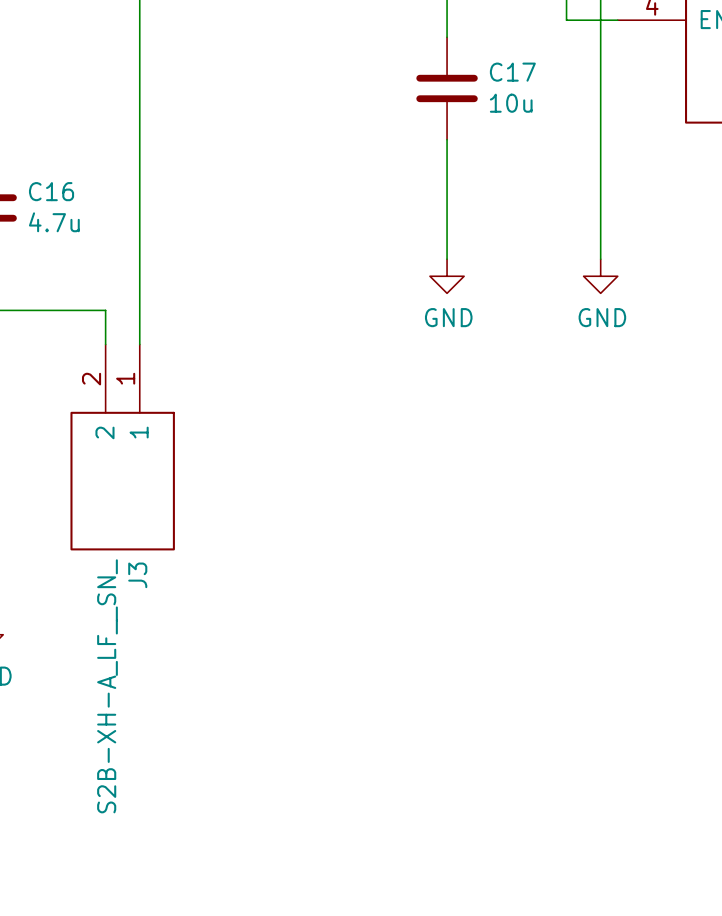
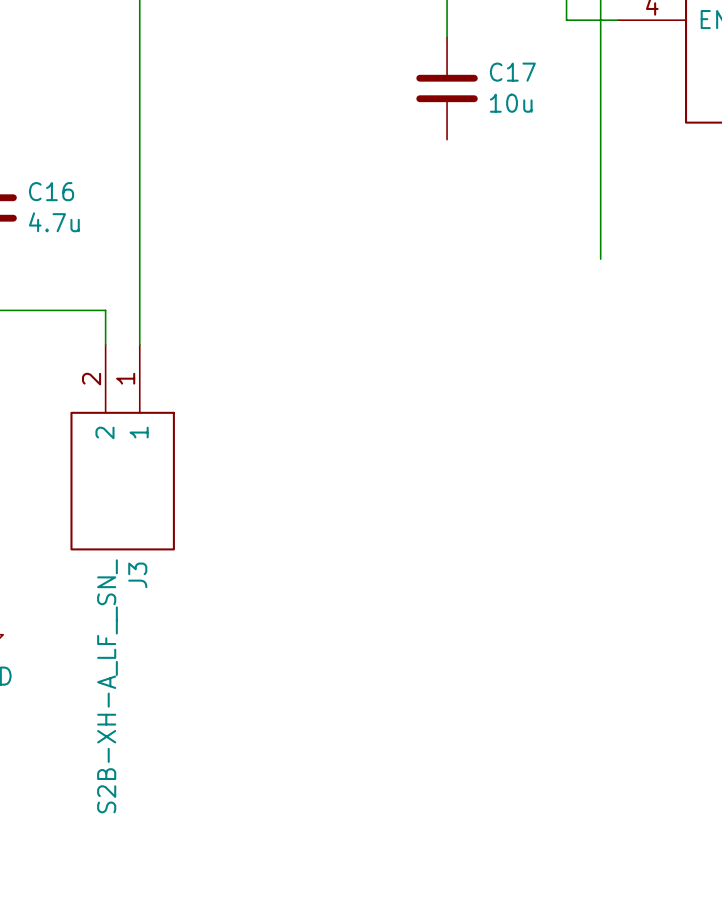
wire: (447, 139) (447, 259) -> none
power symbol: GND (447, 276) -> none
power symbol: GND (600, 276) -> none

